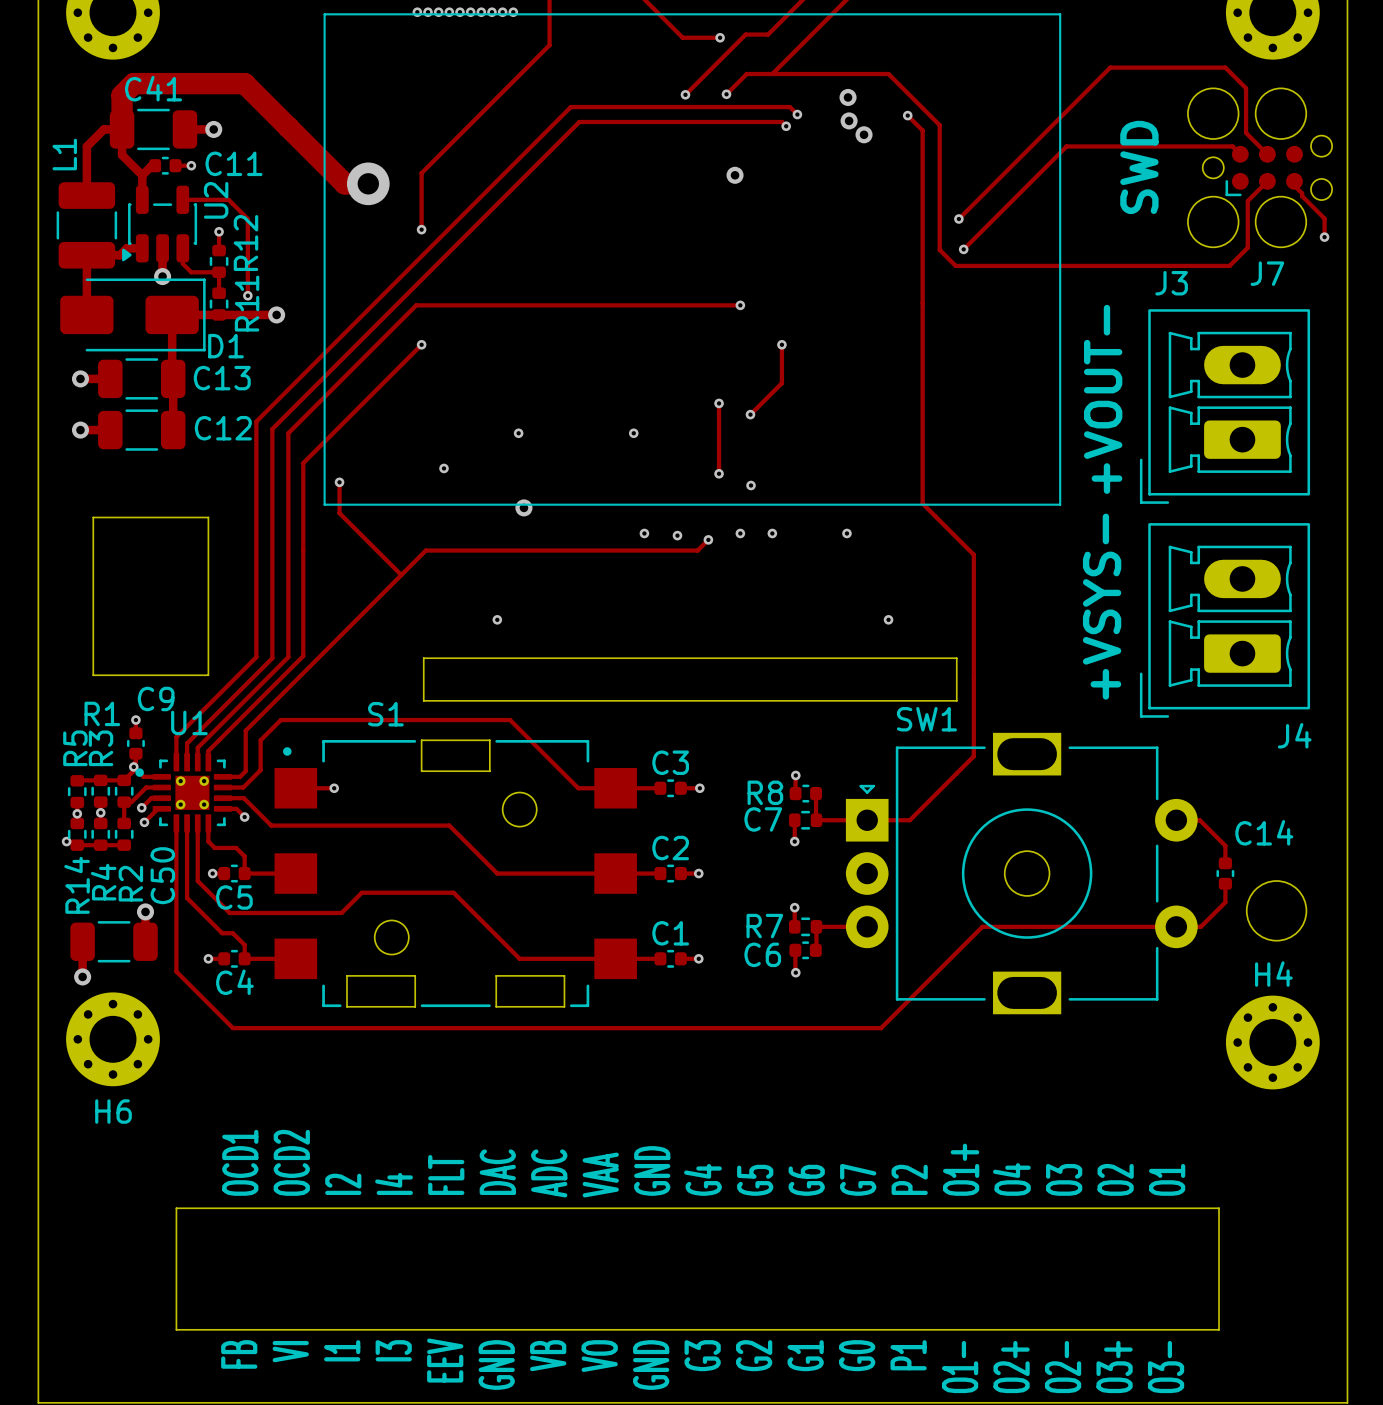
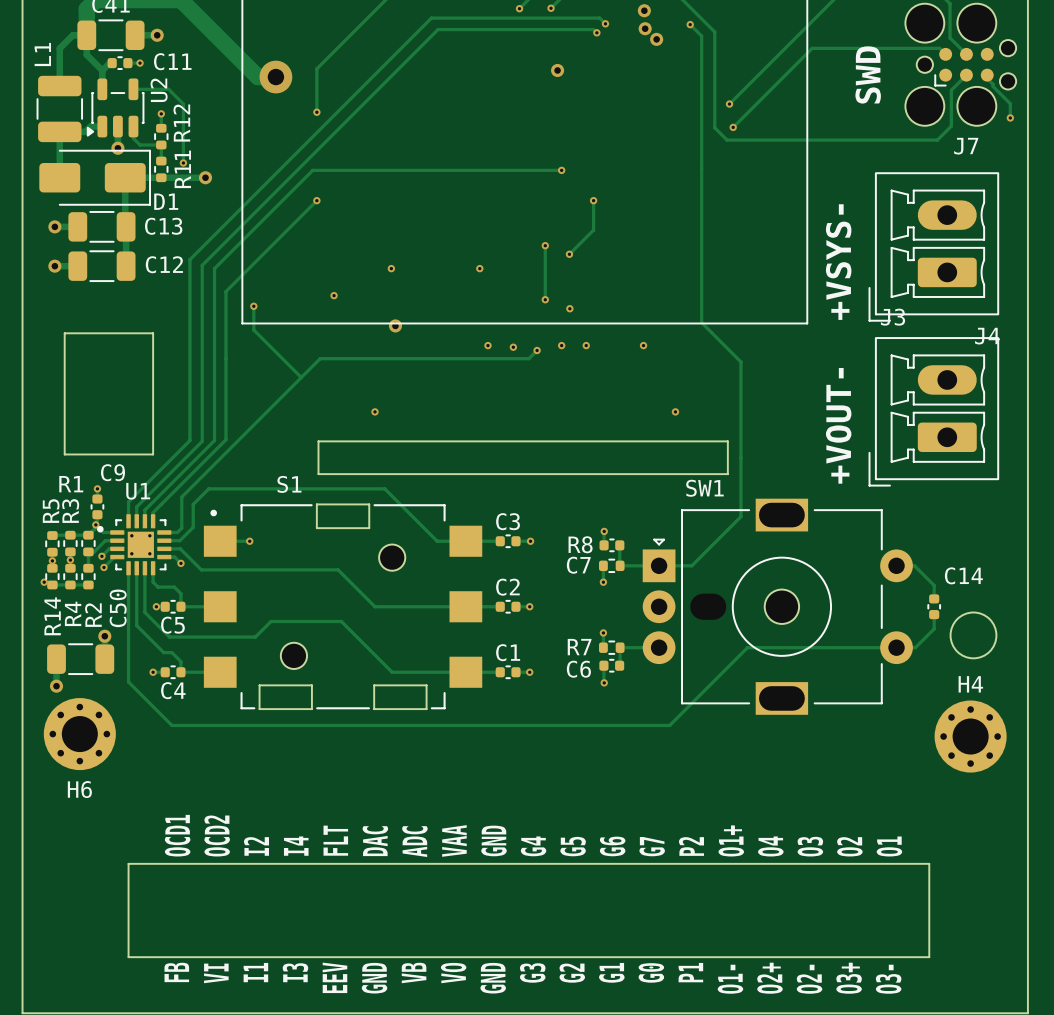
text: +VOUT- (1103, 399) -> +VSYS- (838, 262)
J3 position: (1224, 406) -> (933, 411)
text: +VSYS- (1102, 606) -> +VOUT- (838, 425)
J4 position: (1224, 620) -> (933, 246)

